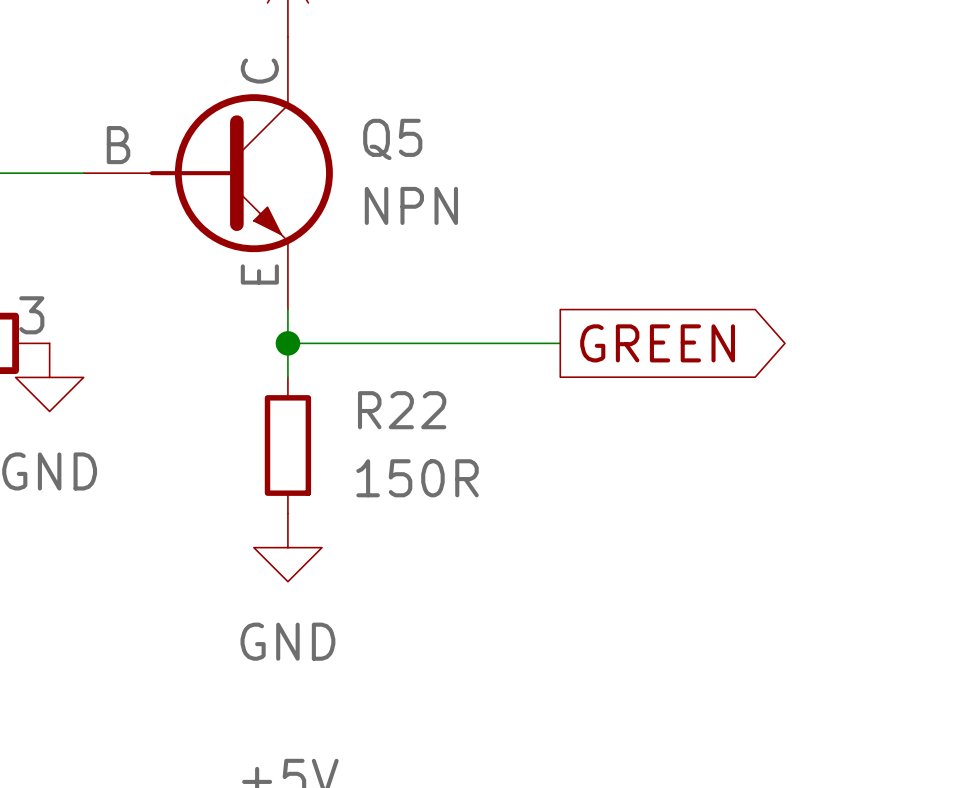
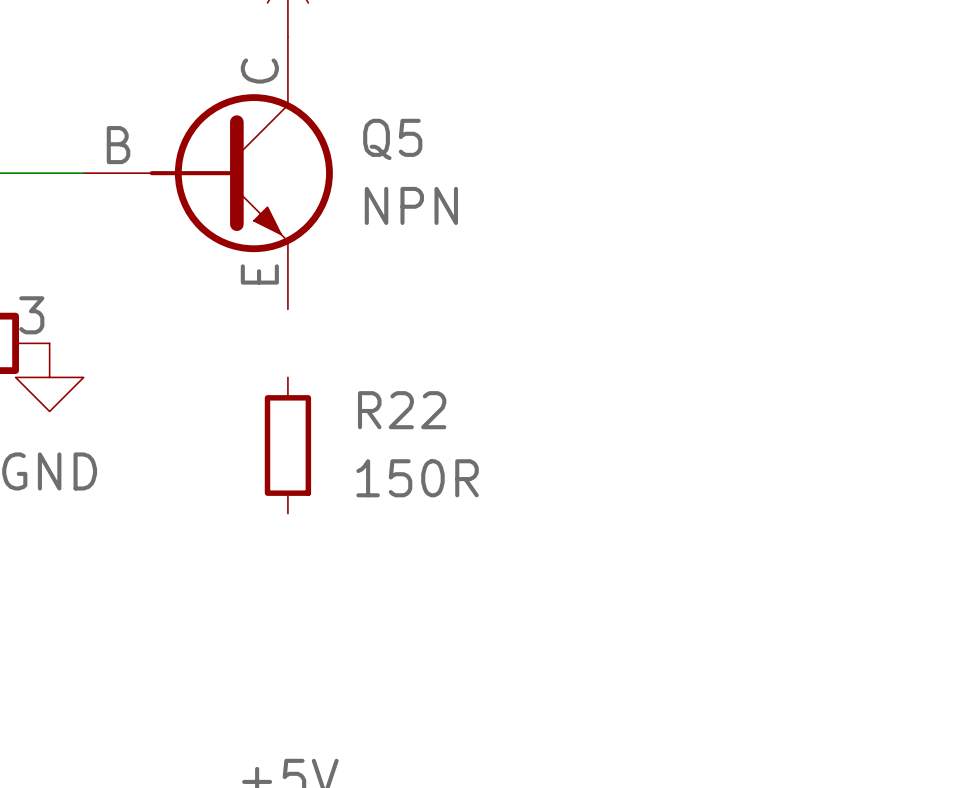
wire: (287, 309) (287, 377) -> none
wire: (287, 343) (560, 343) -> none
junction: (287, 343) -> none
global label: GREEN (657, 343) -> none
power symbol: GND (287, 547) -> none

